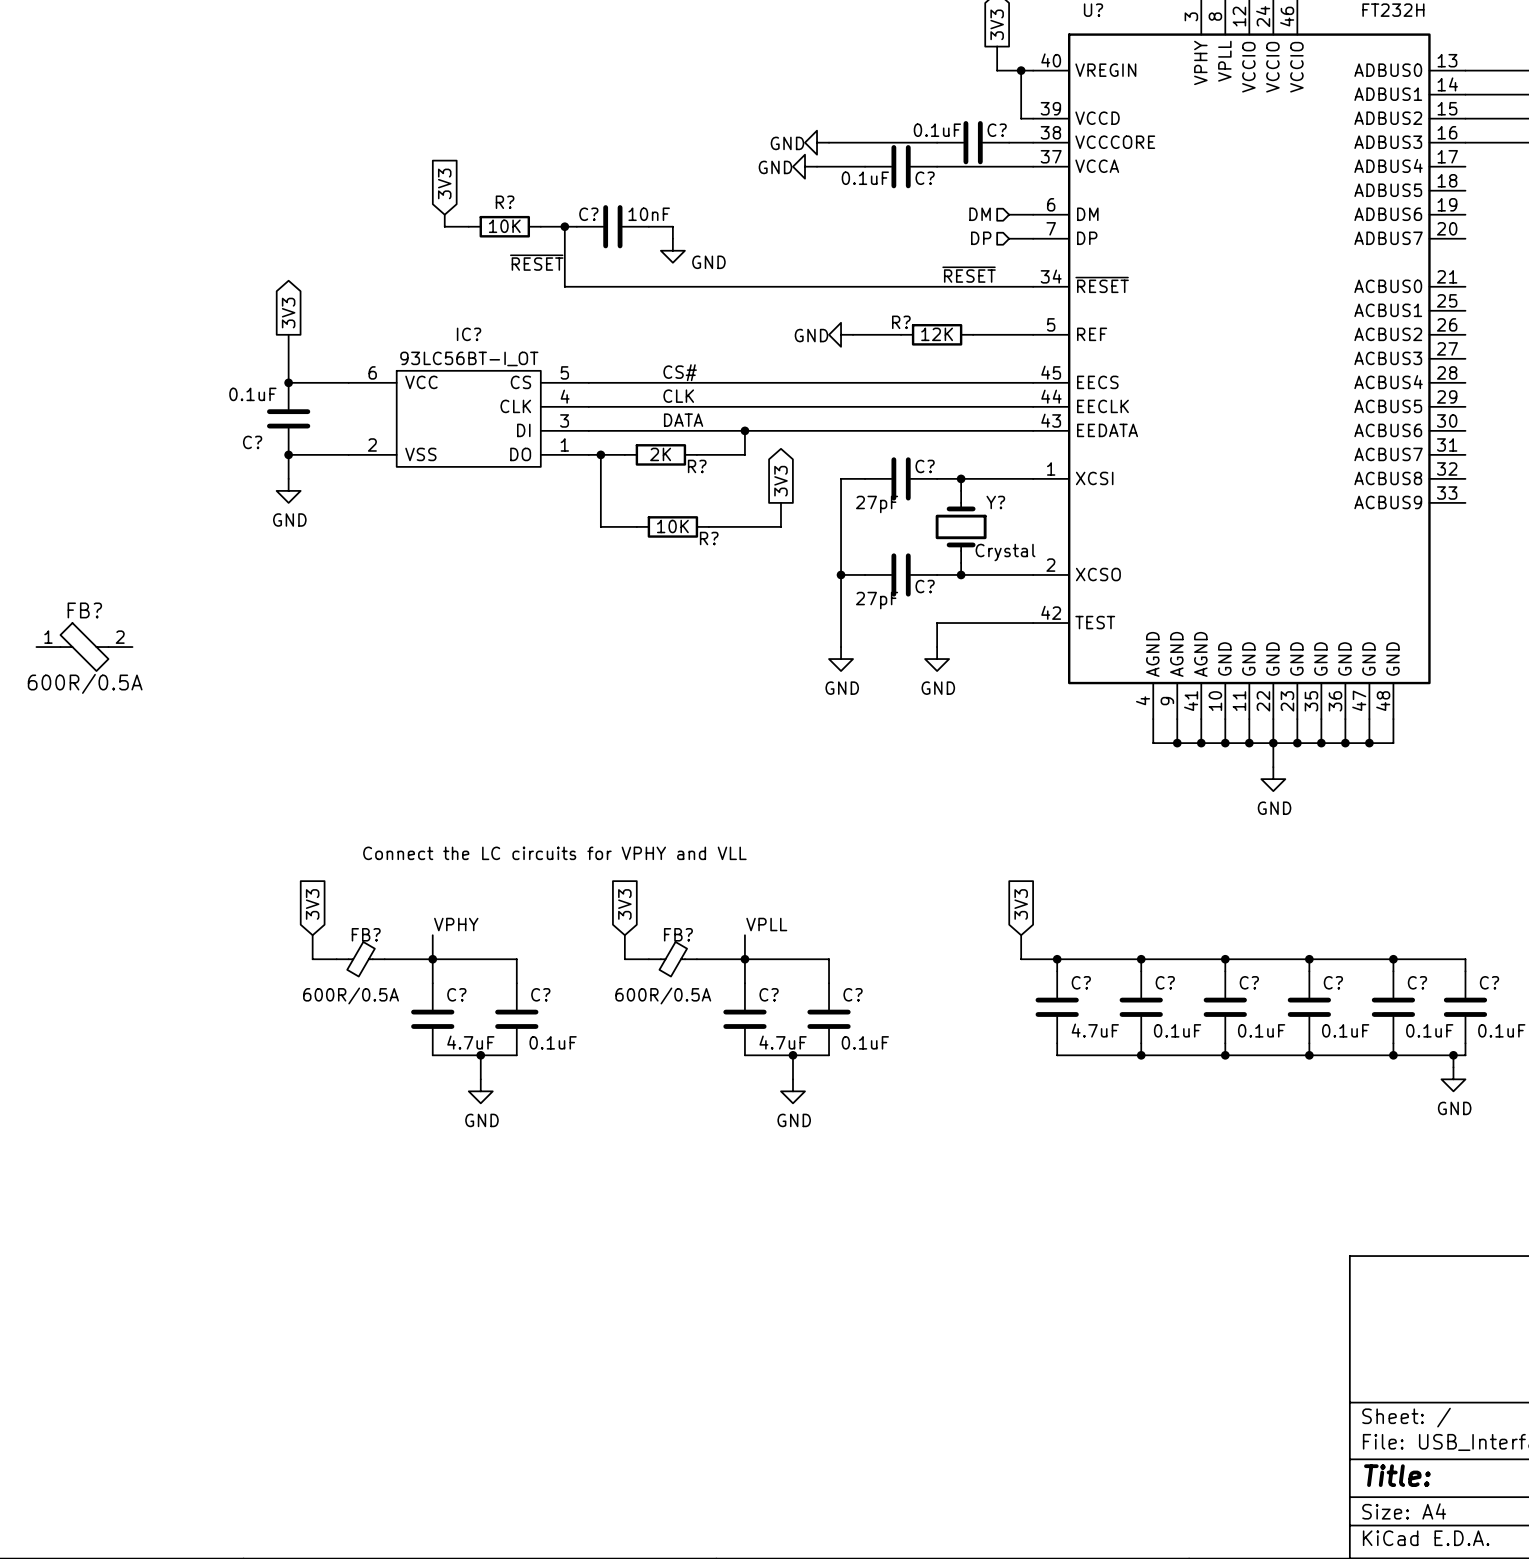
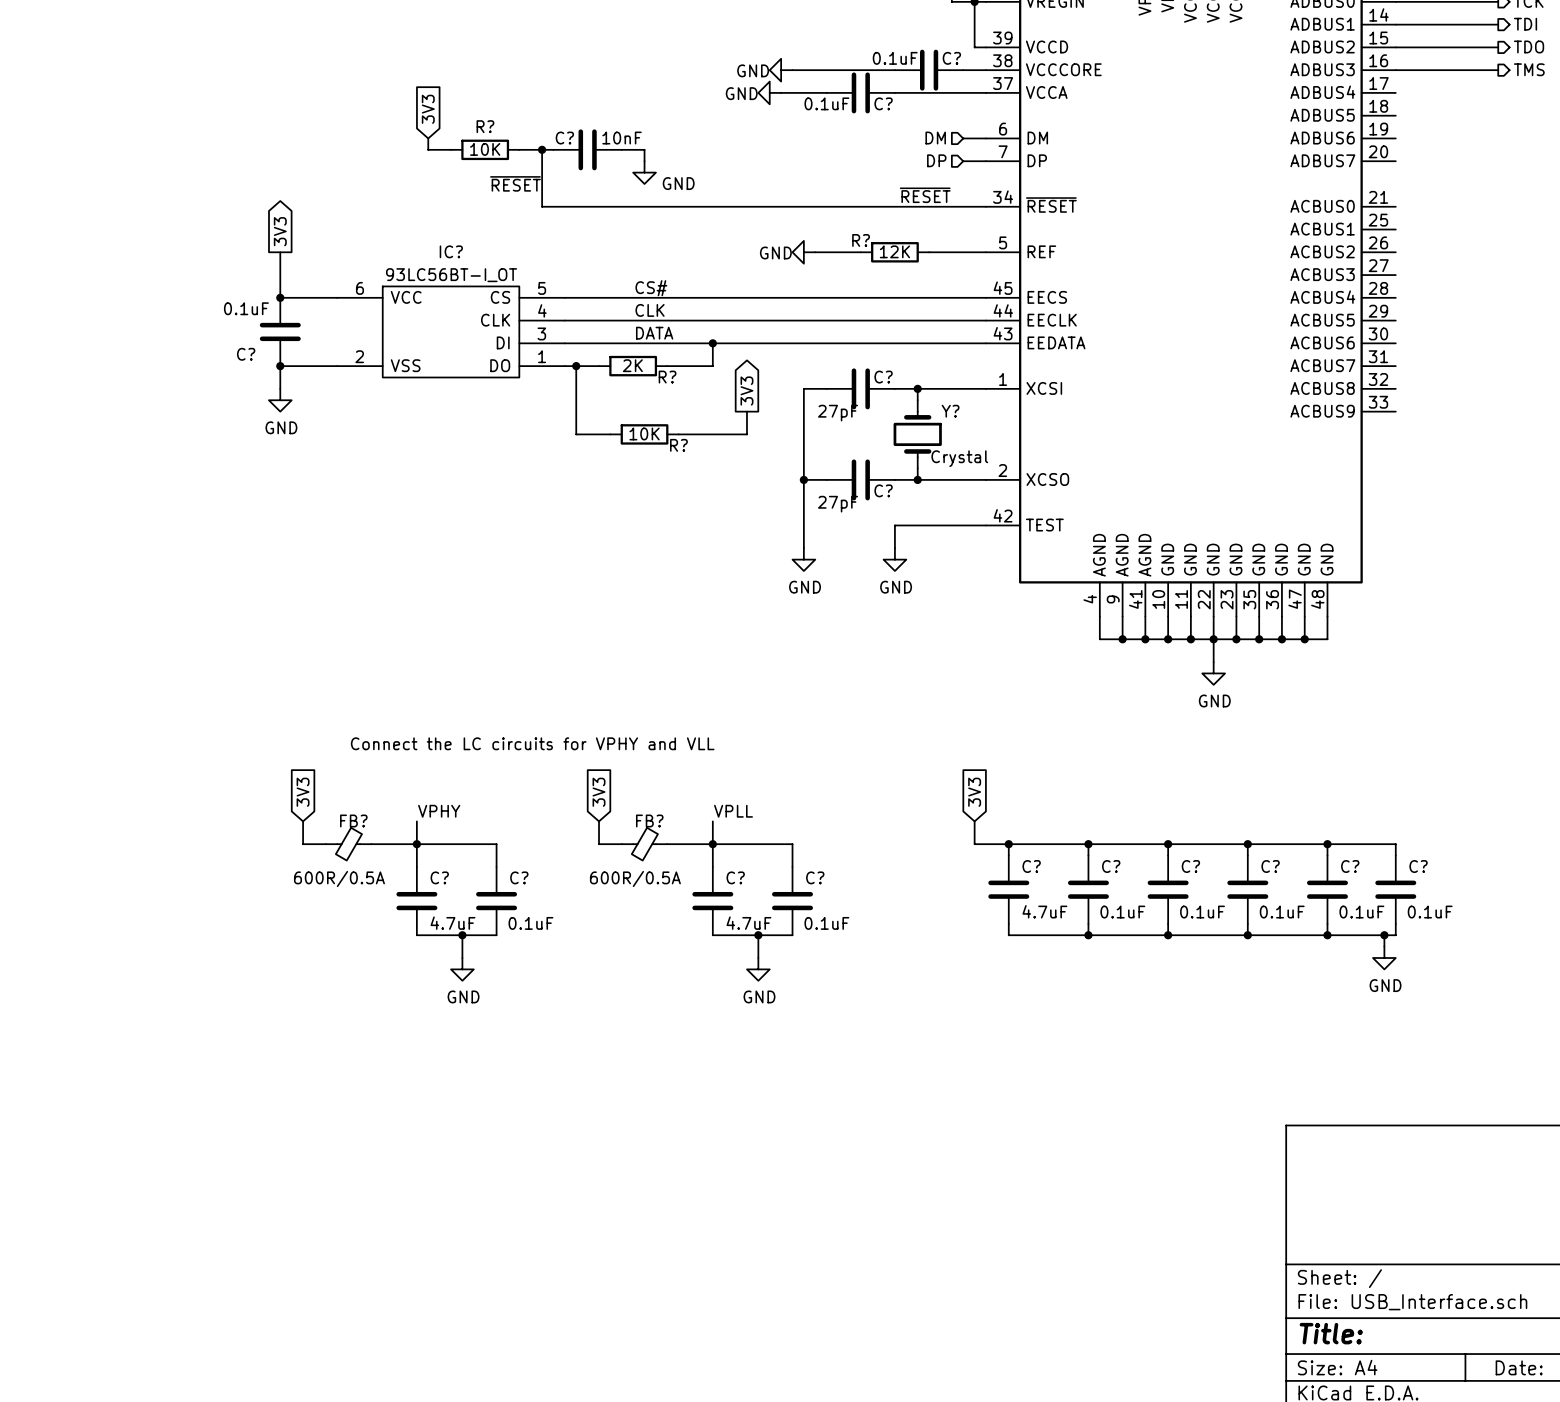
FB?: 600R/0.5A (84, 647) -> none

